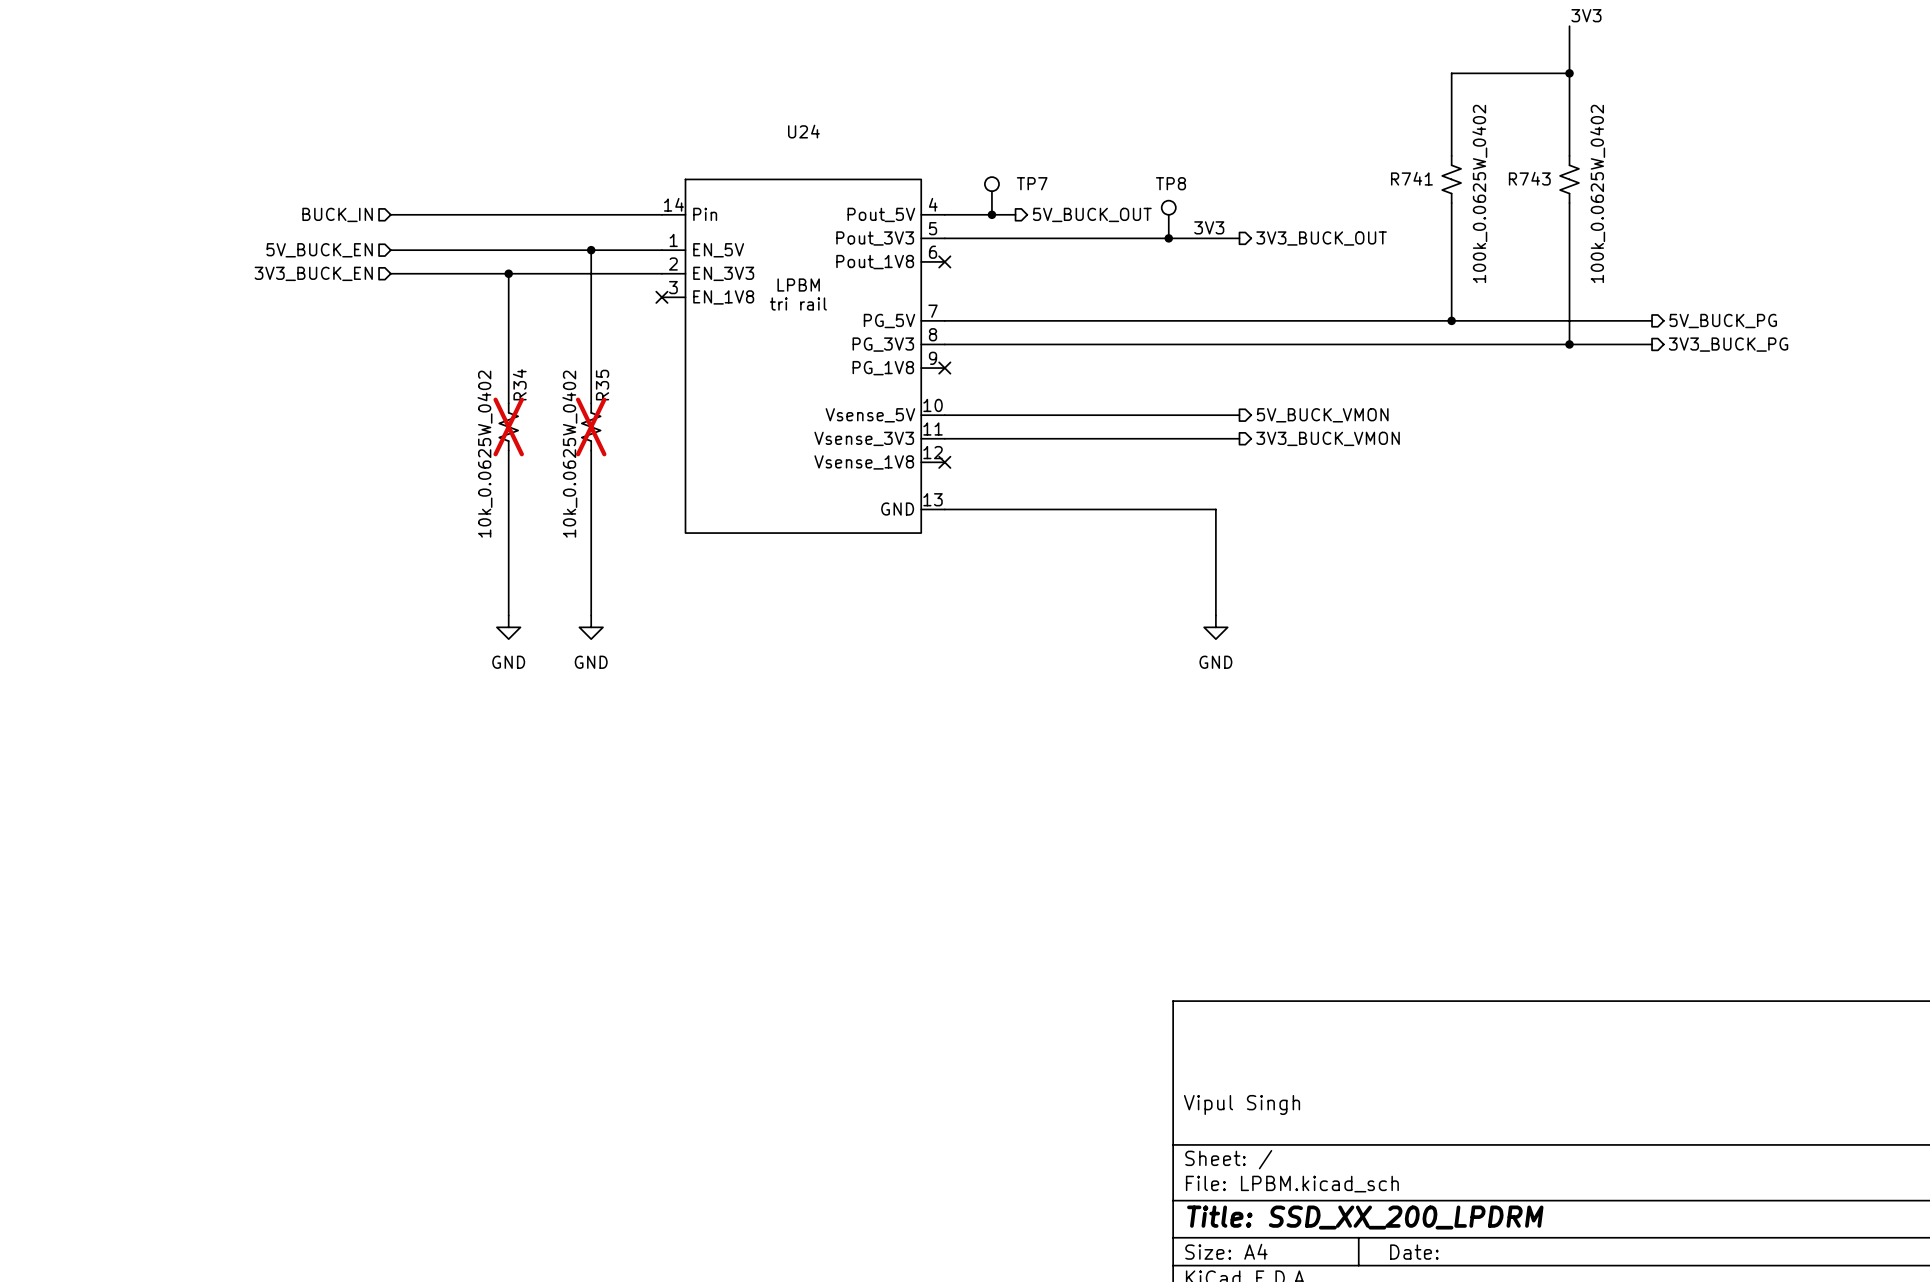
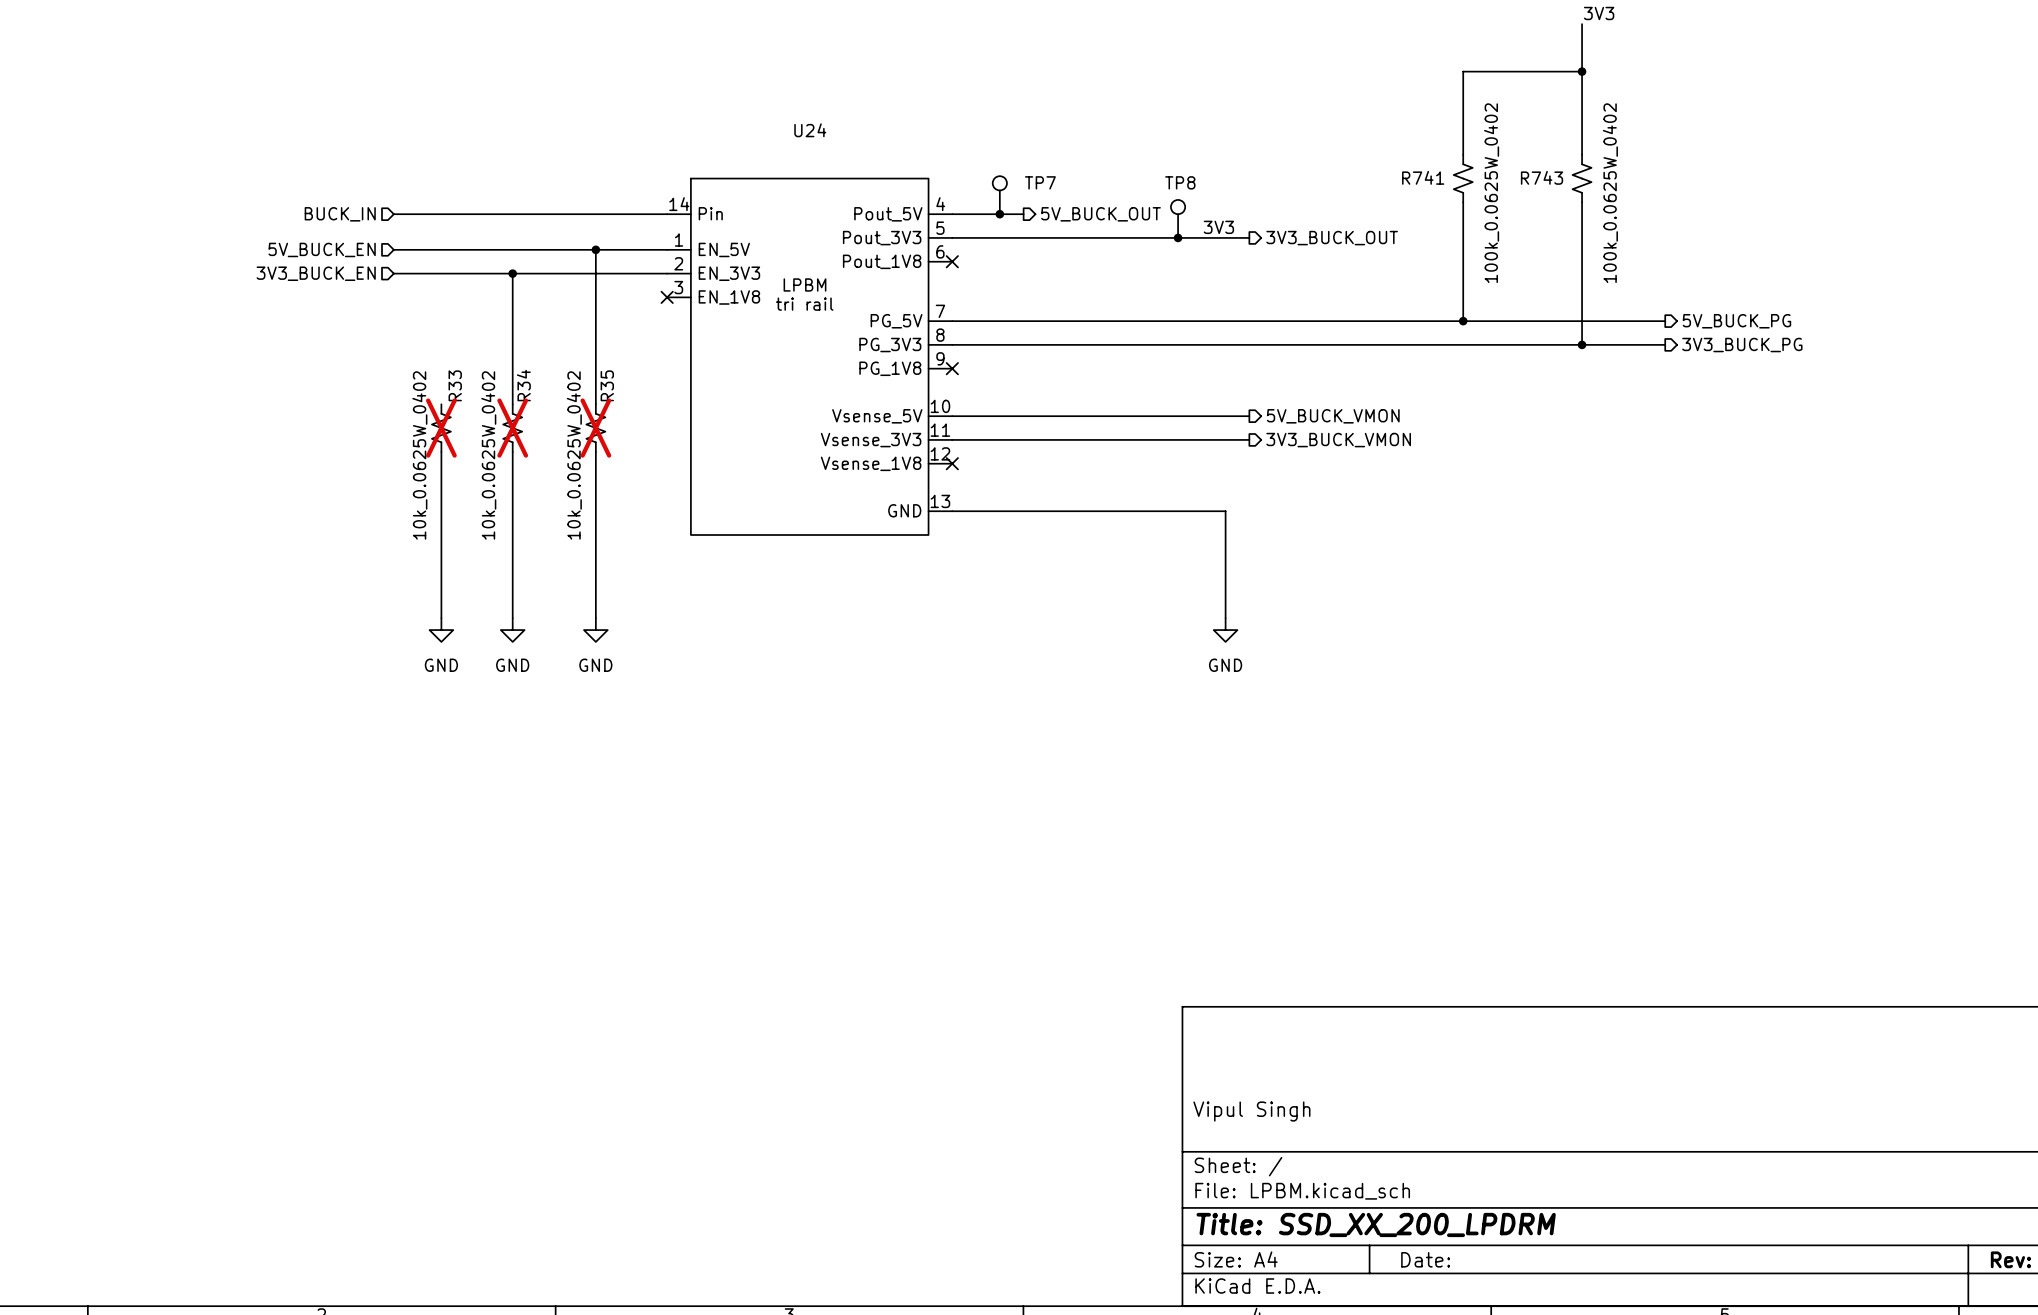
R33: none -> 10k_0.0625W_0402 (441, 428)
wire: none -> (441, 451) (441, 618)
power symbol: none -> GND (441, 630)

